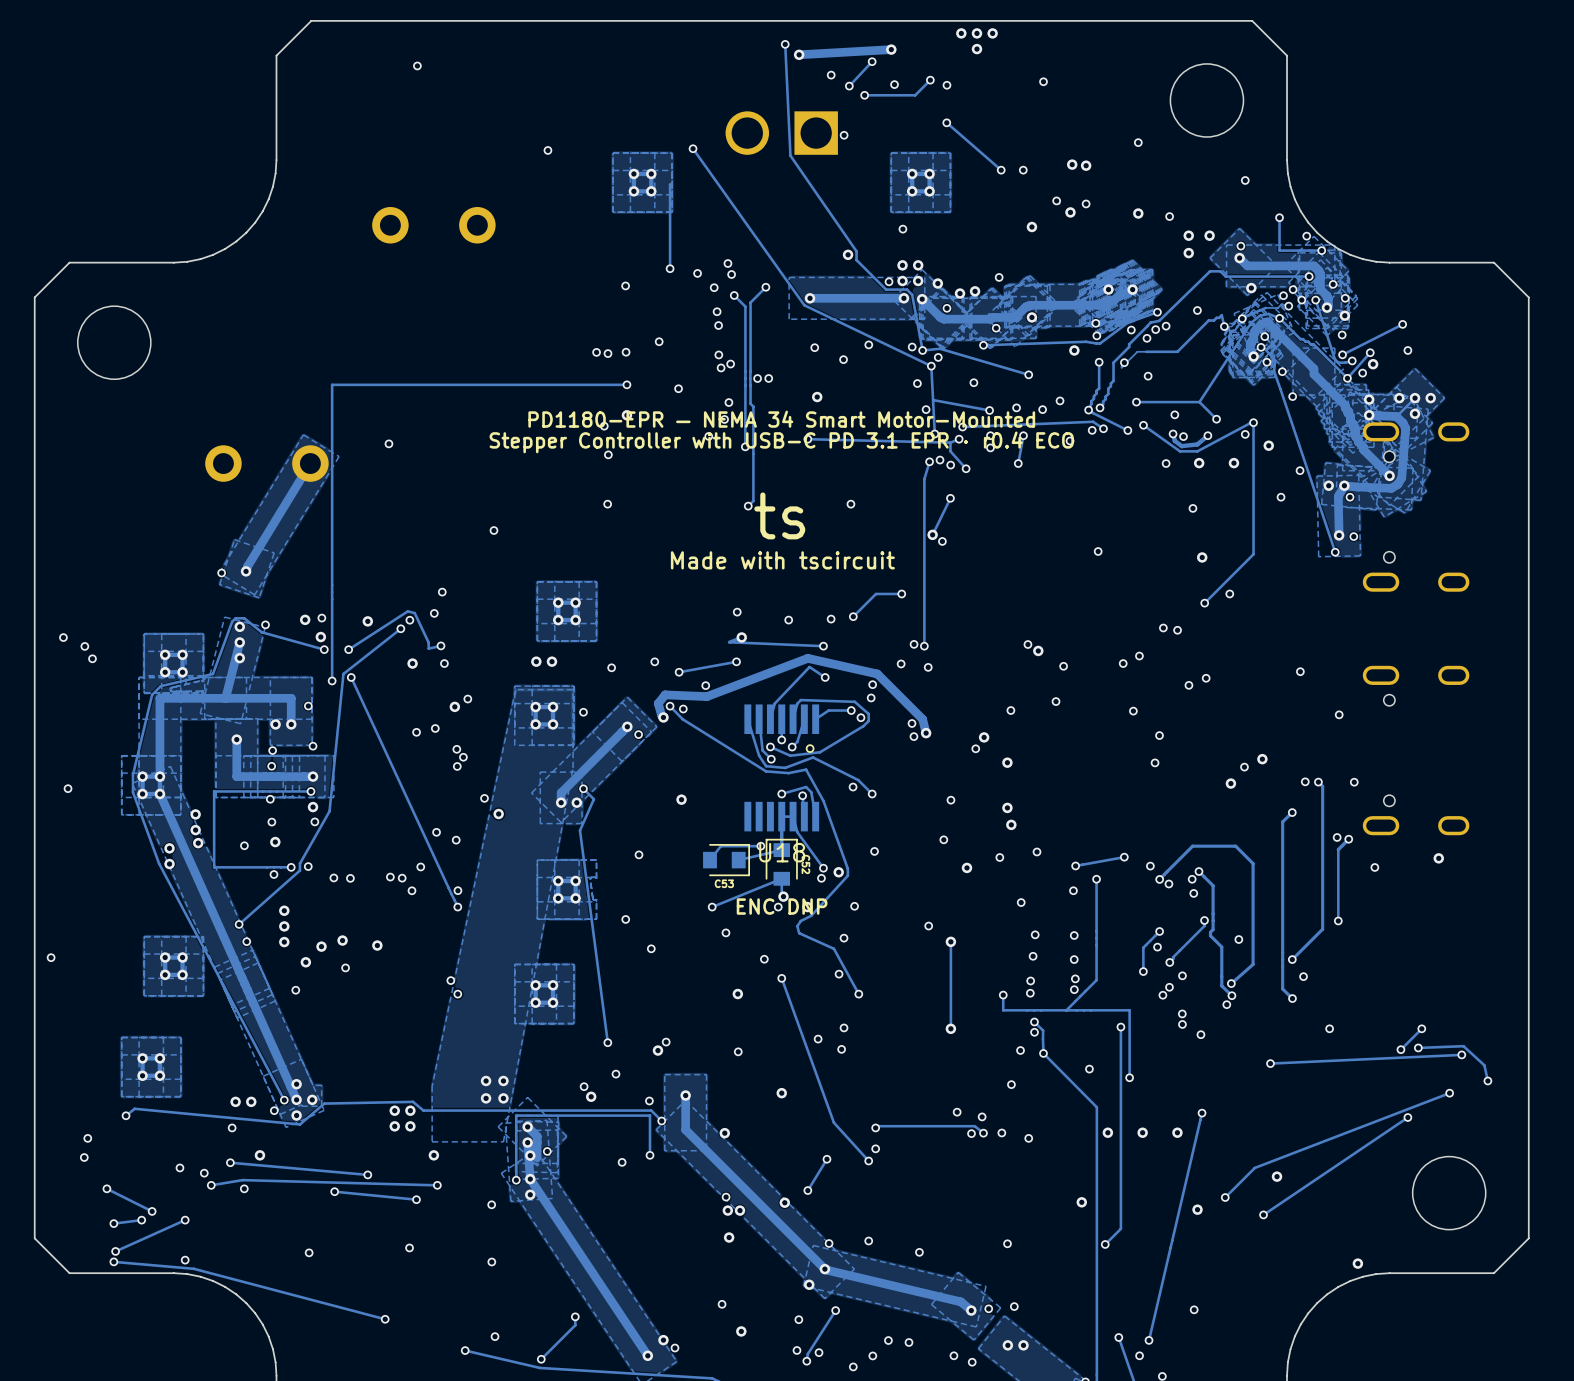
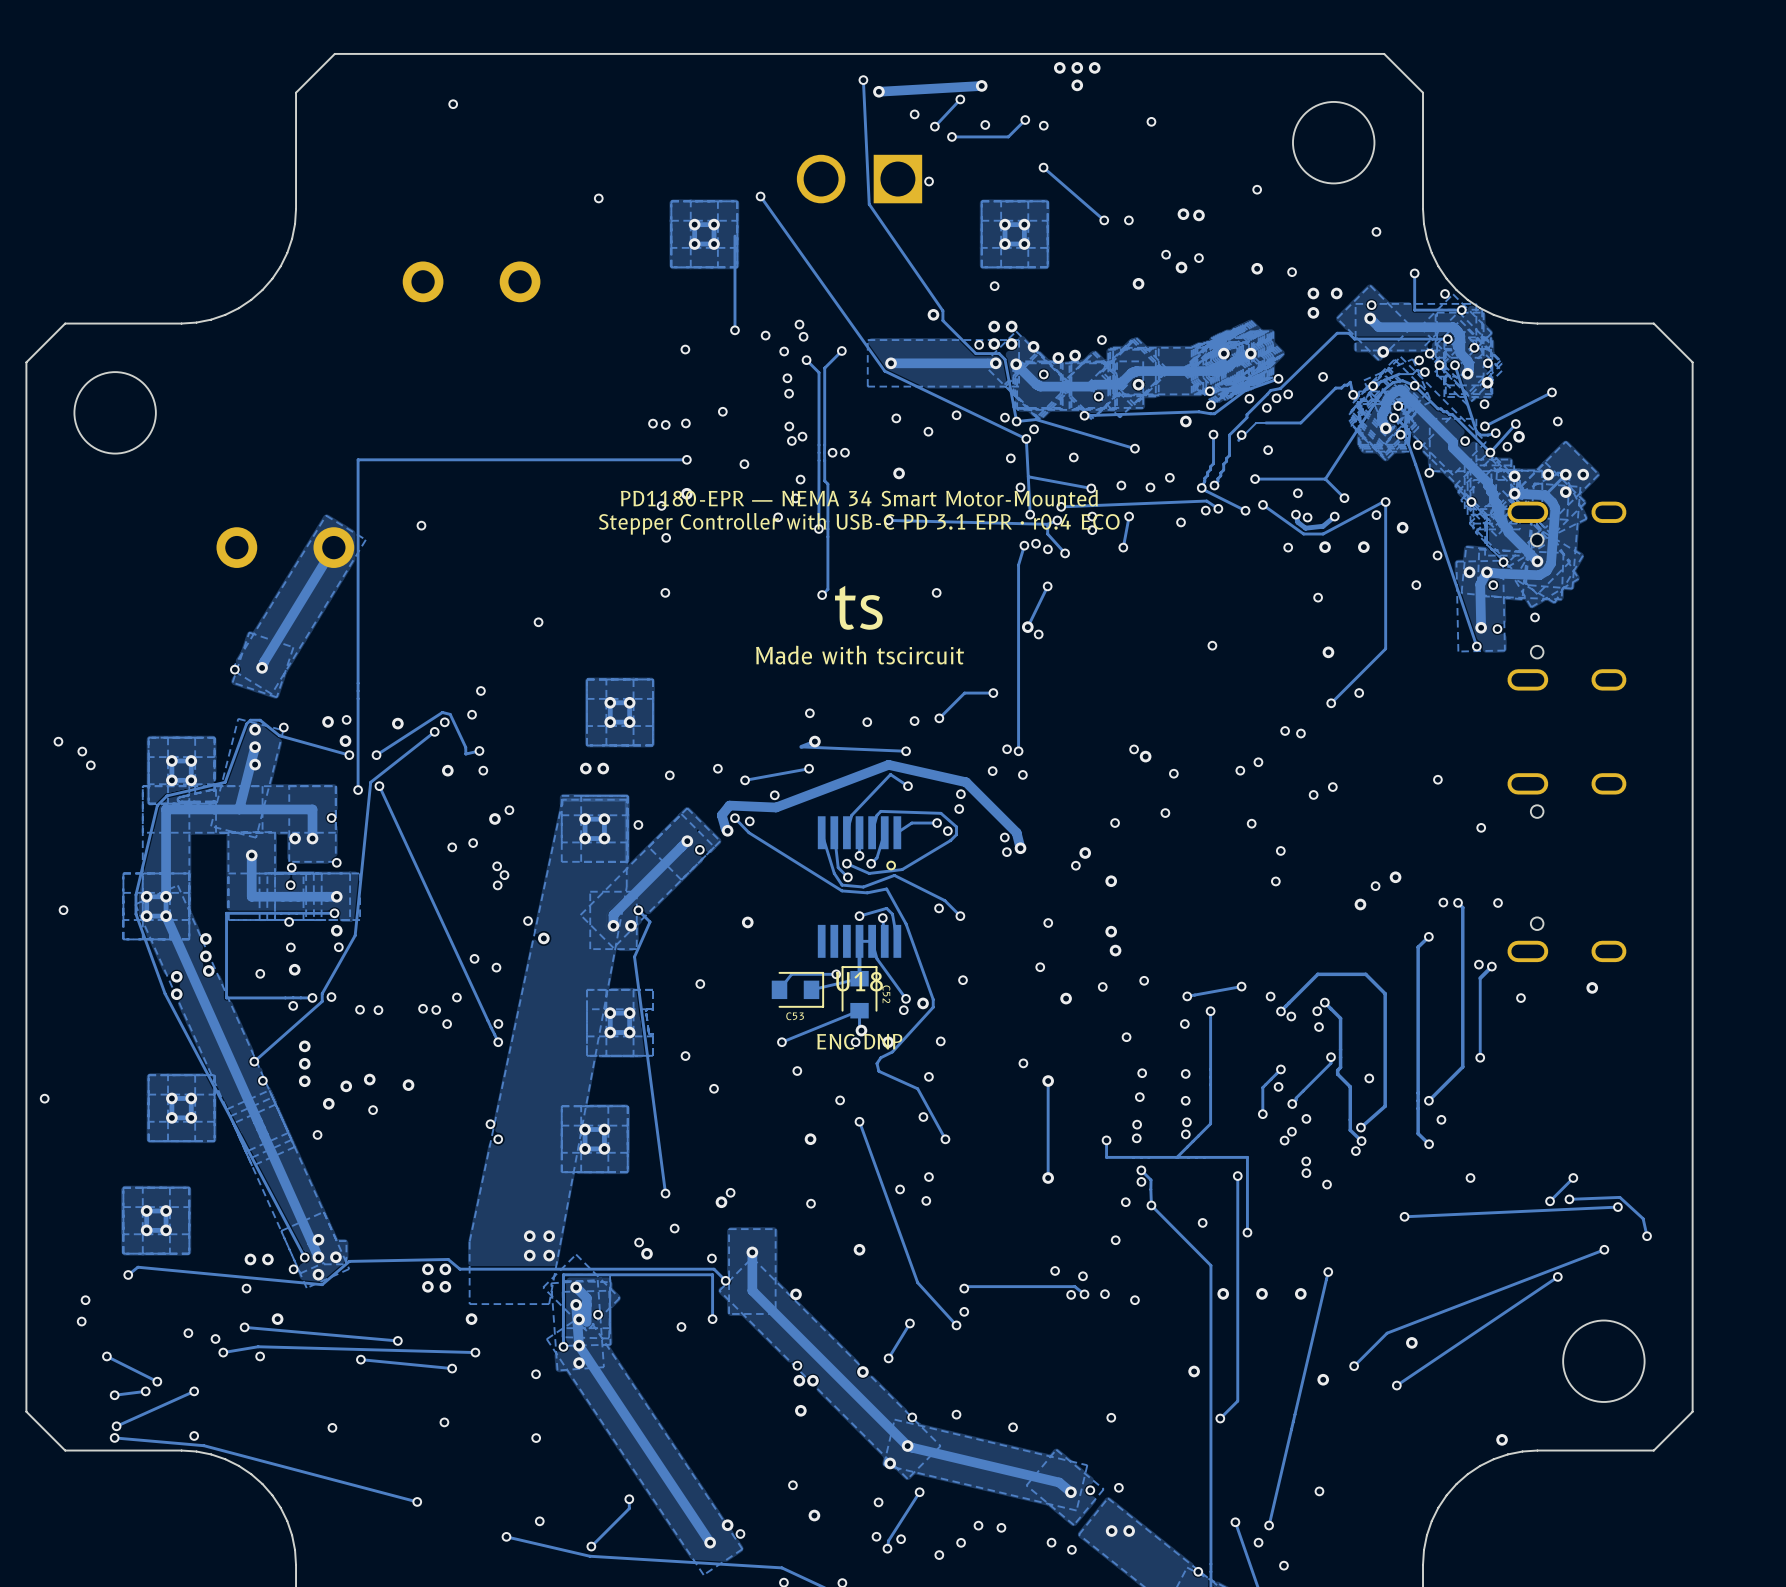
via: none -> (1465, 441)
track: none -> (1471, 502) (1487, 517) (1487, 544) (1503, 562)
via: none -> (1471, 502)
via: none -> (1503, 562)
via: none -> (1535, 617)

